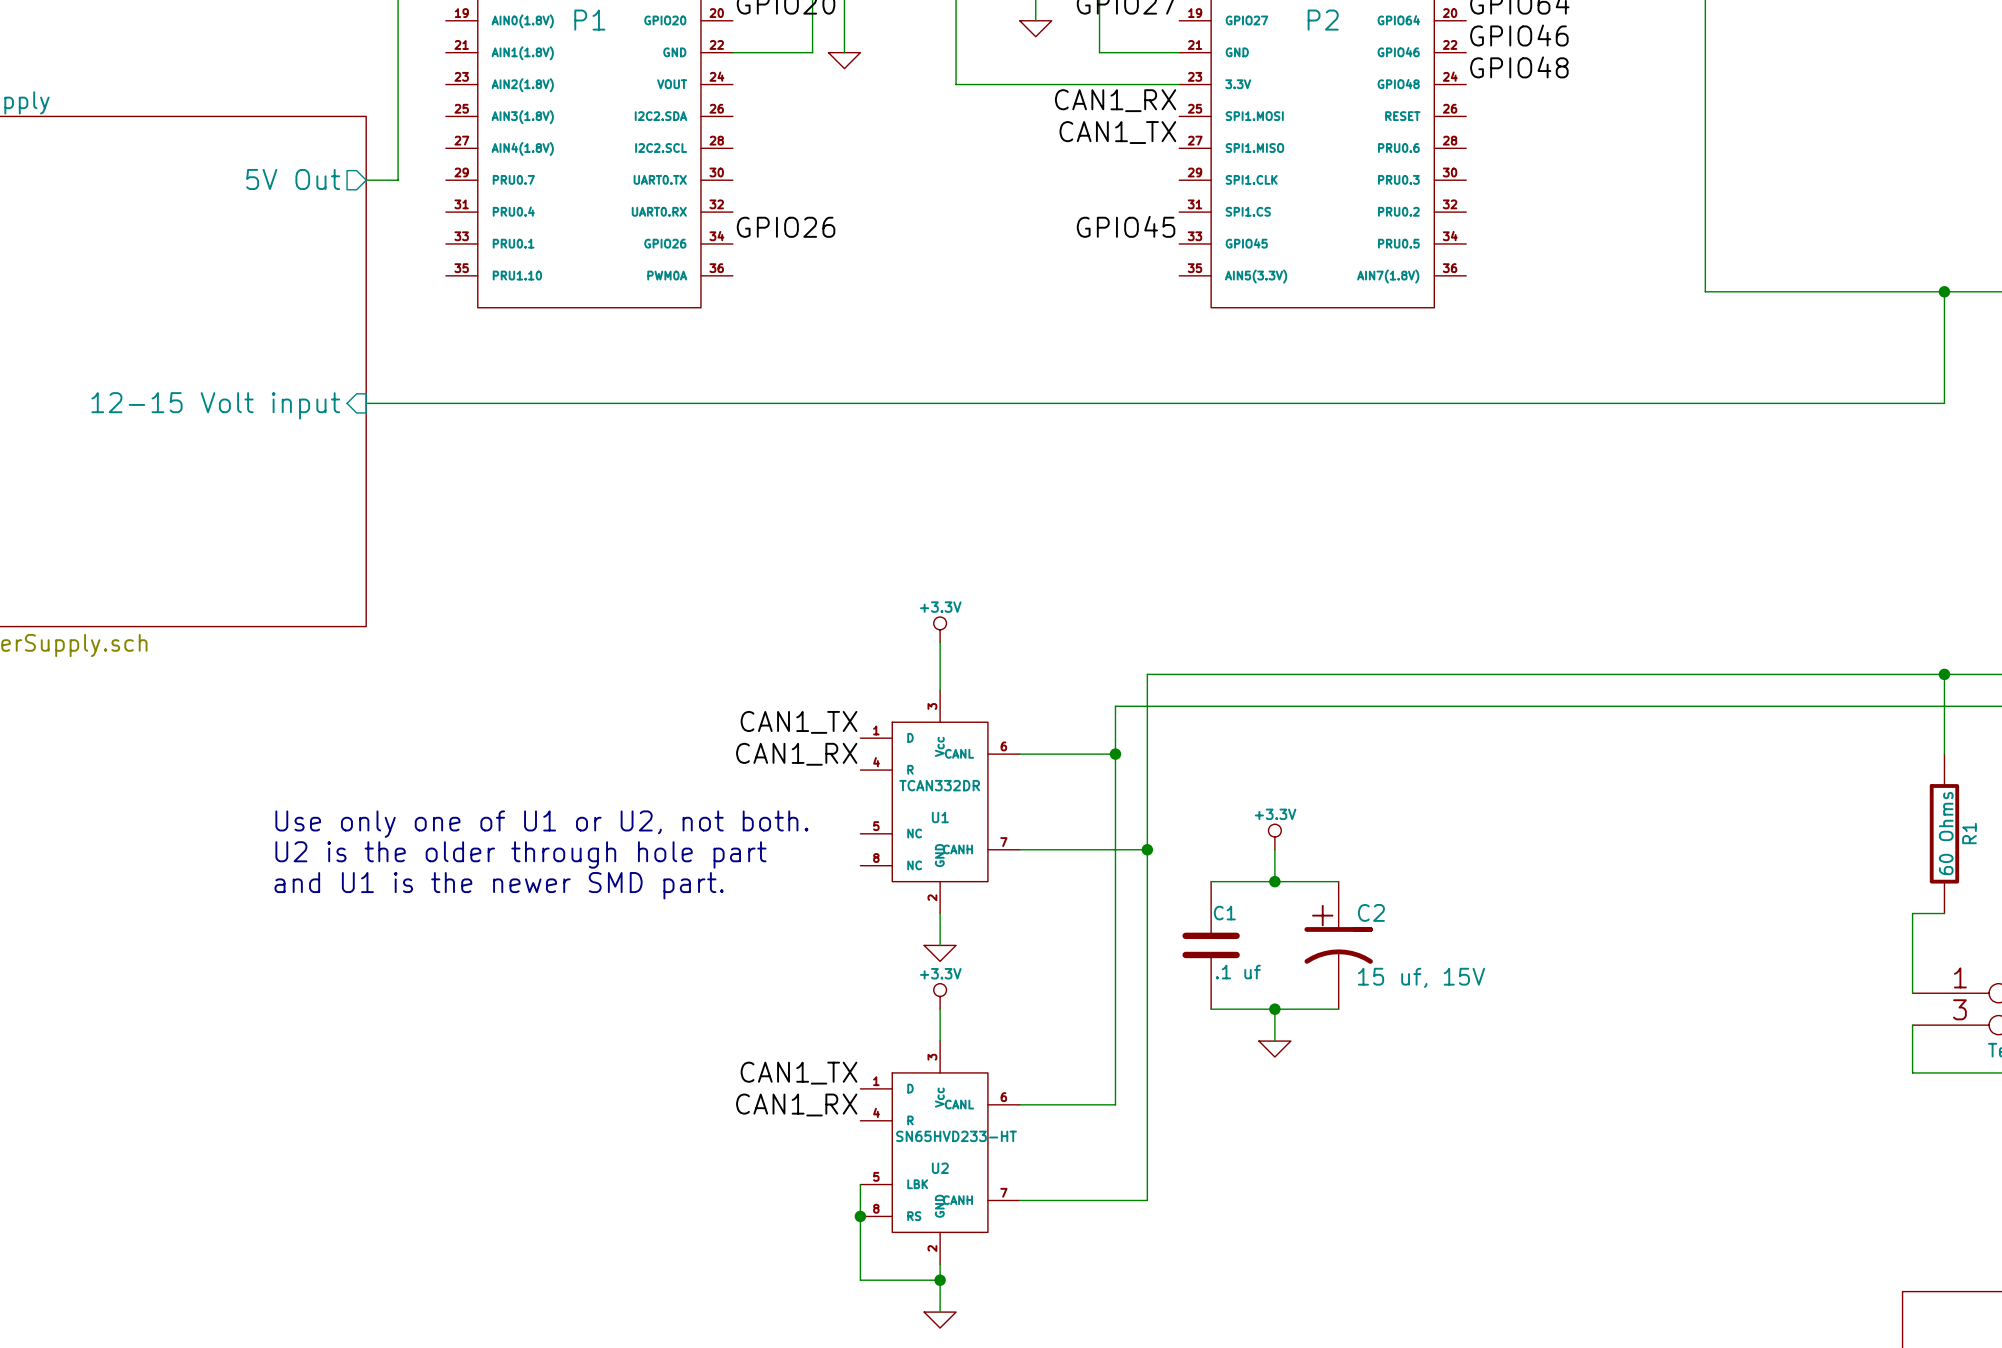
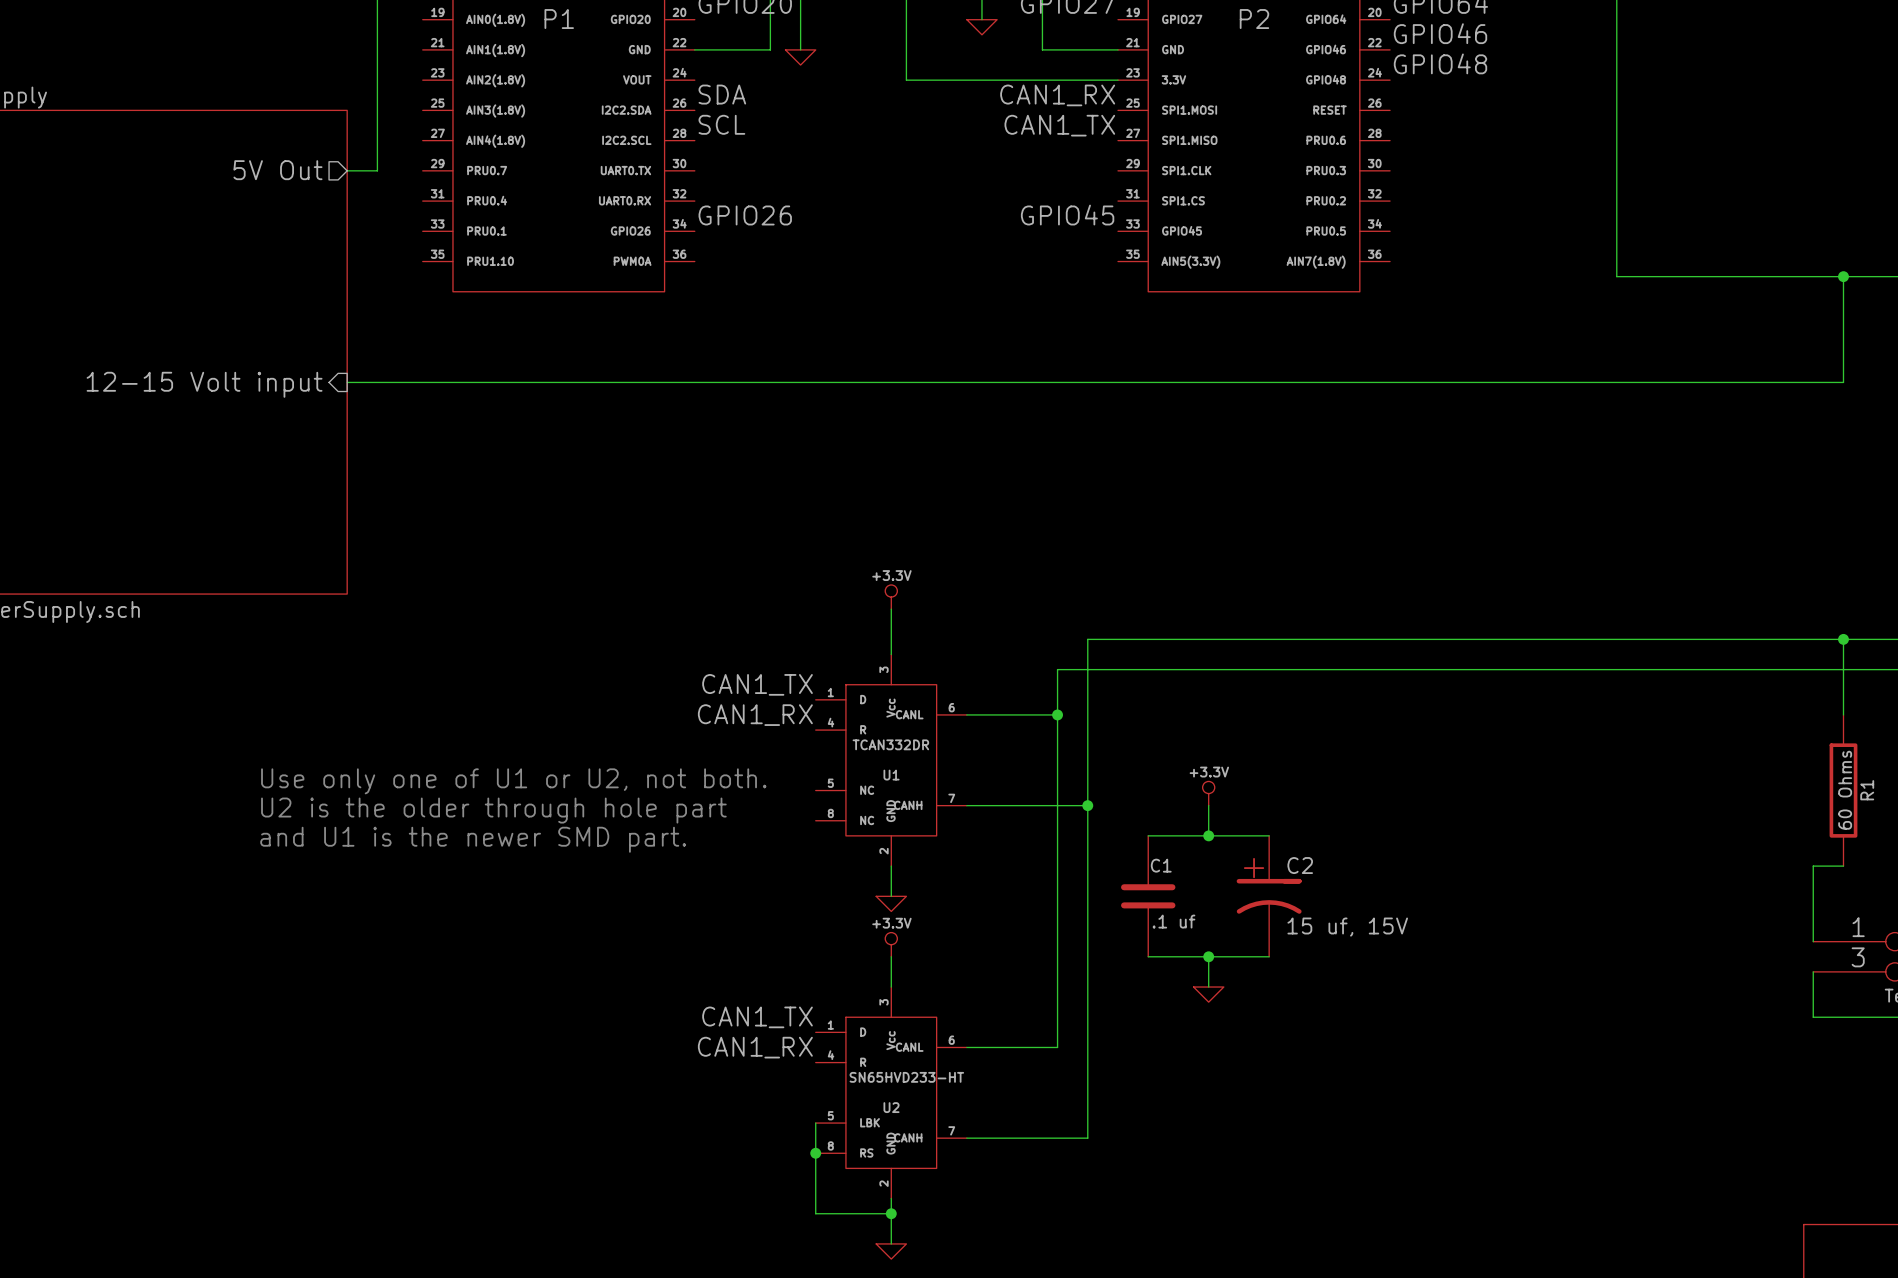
label: none -> SDA (722, 94)
label: none -> SCL (721, 124)

